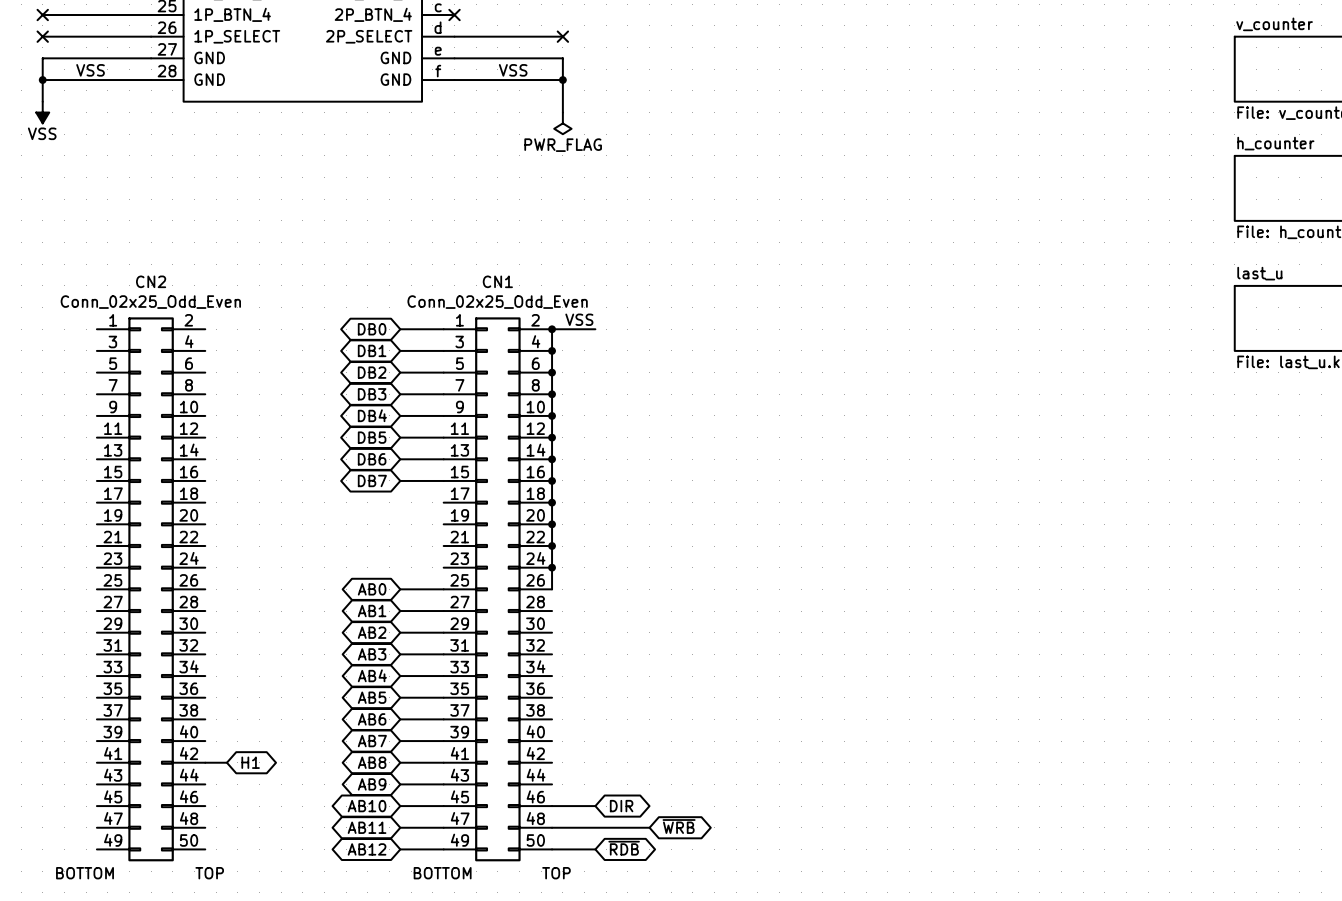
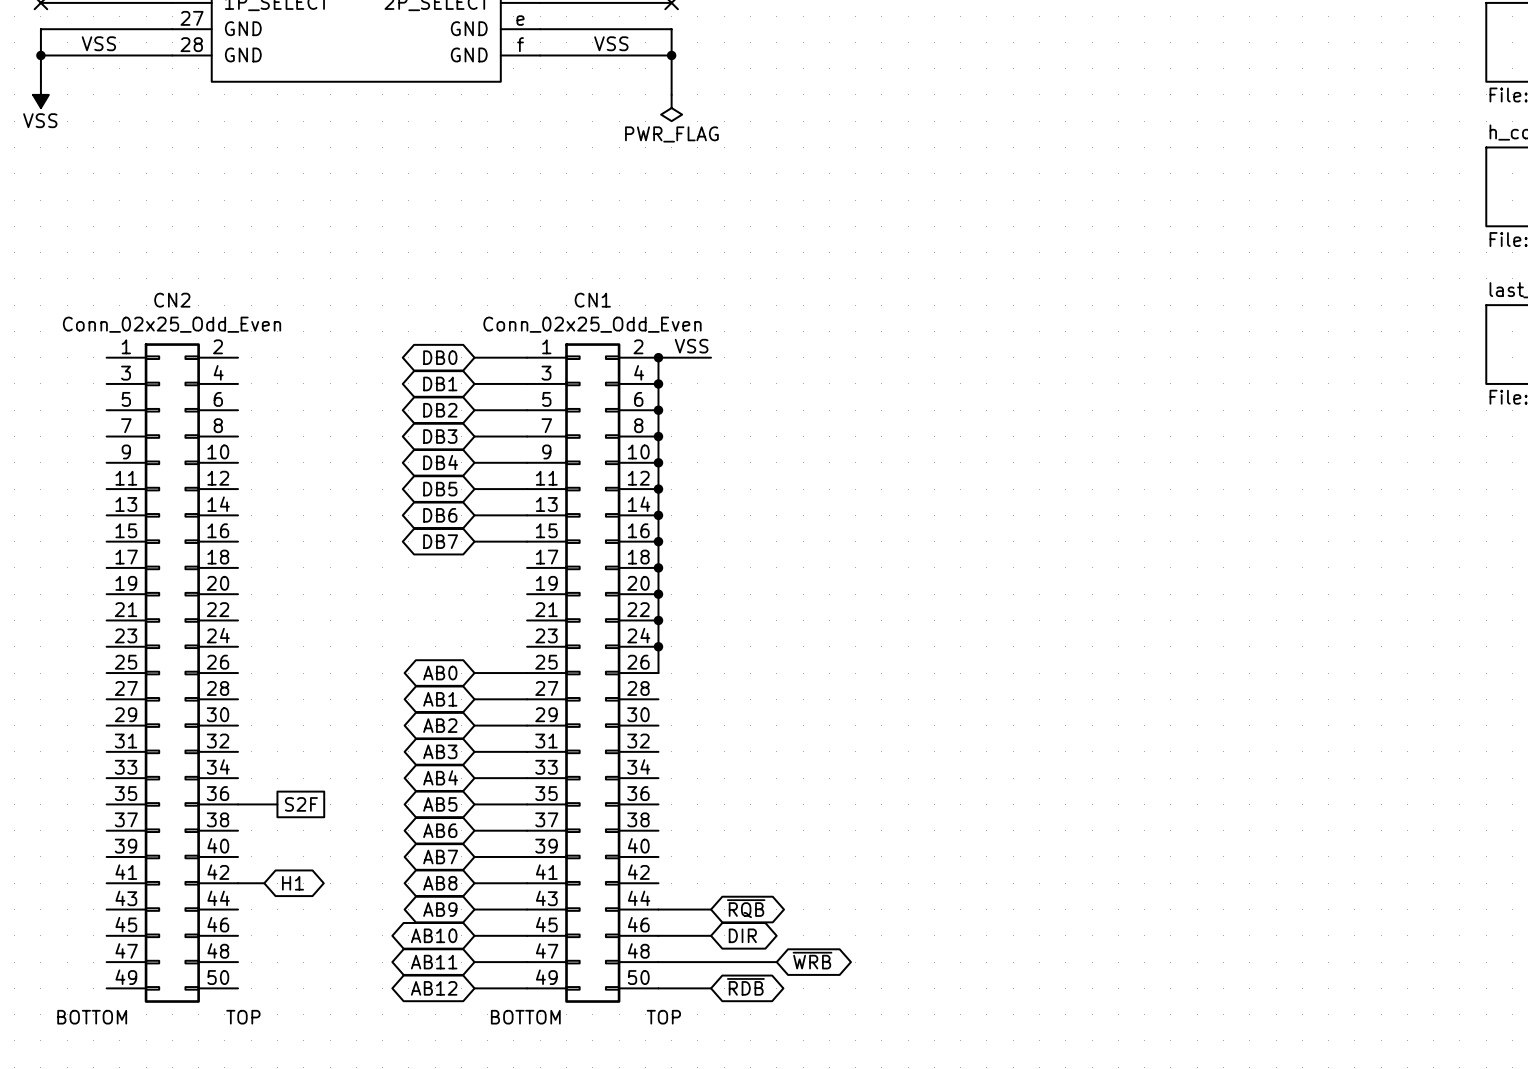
wire: none -> (238, 804) (277, 804)
global label: none -> S2F (301, 804)
global label: none -> ~{RQB} (746, 908)
wire: none -> (658, 909) (711, 909)

